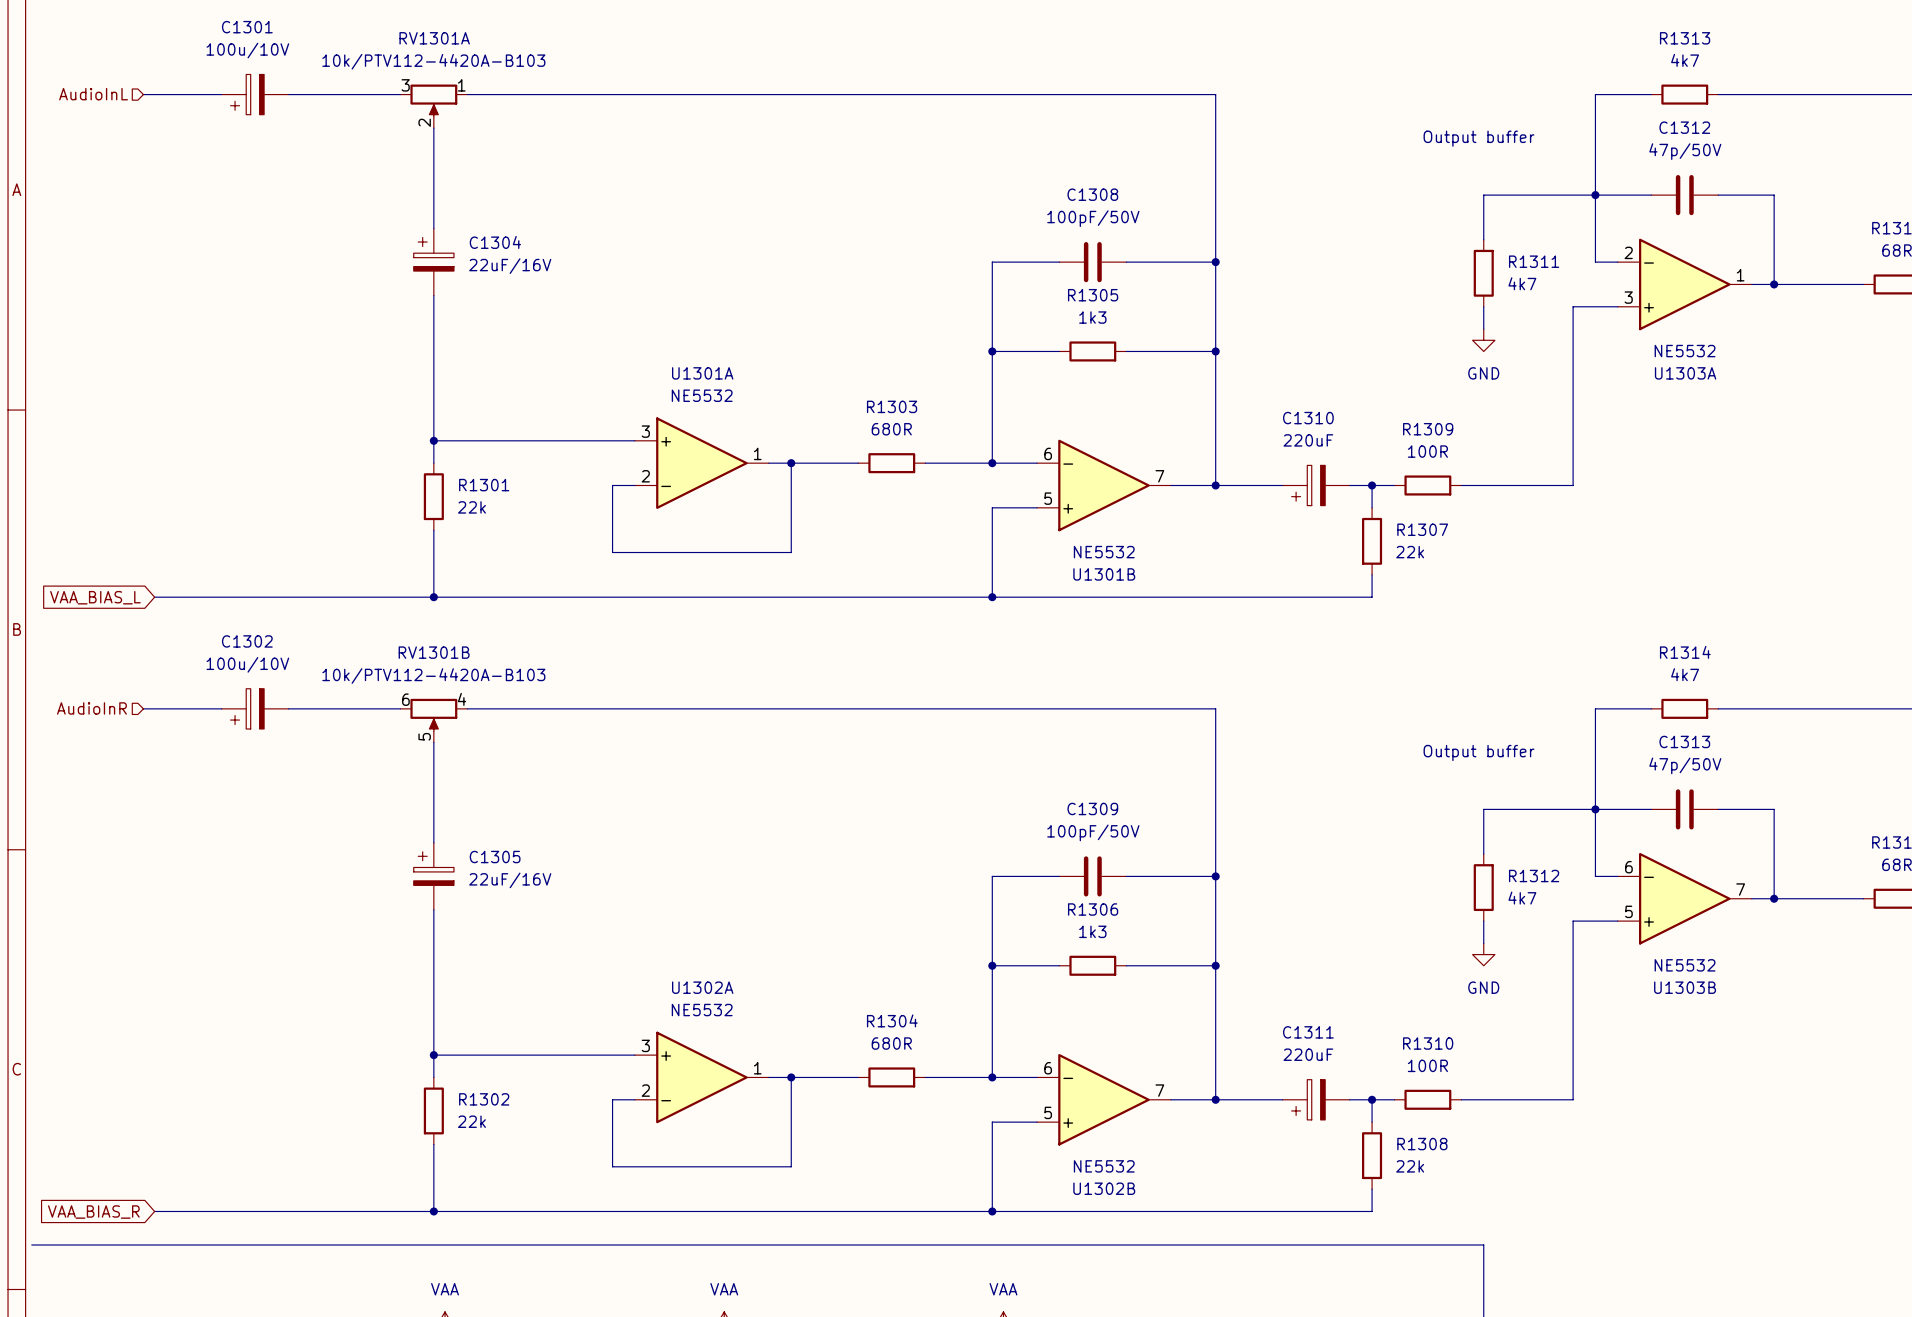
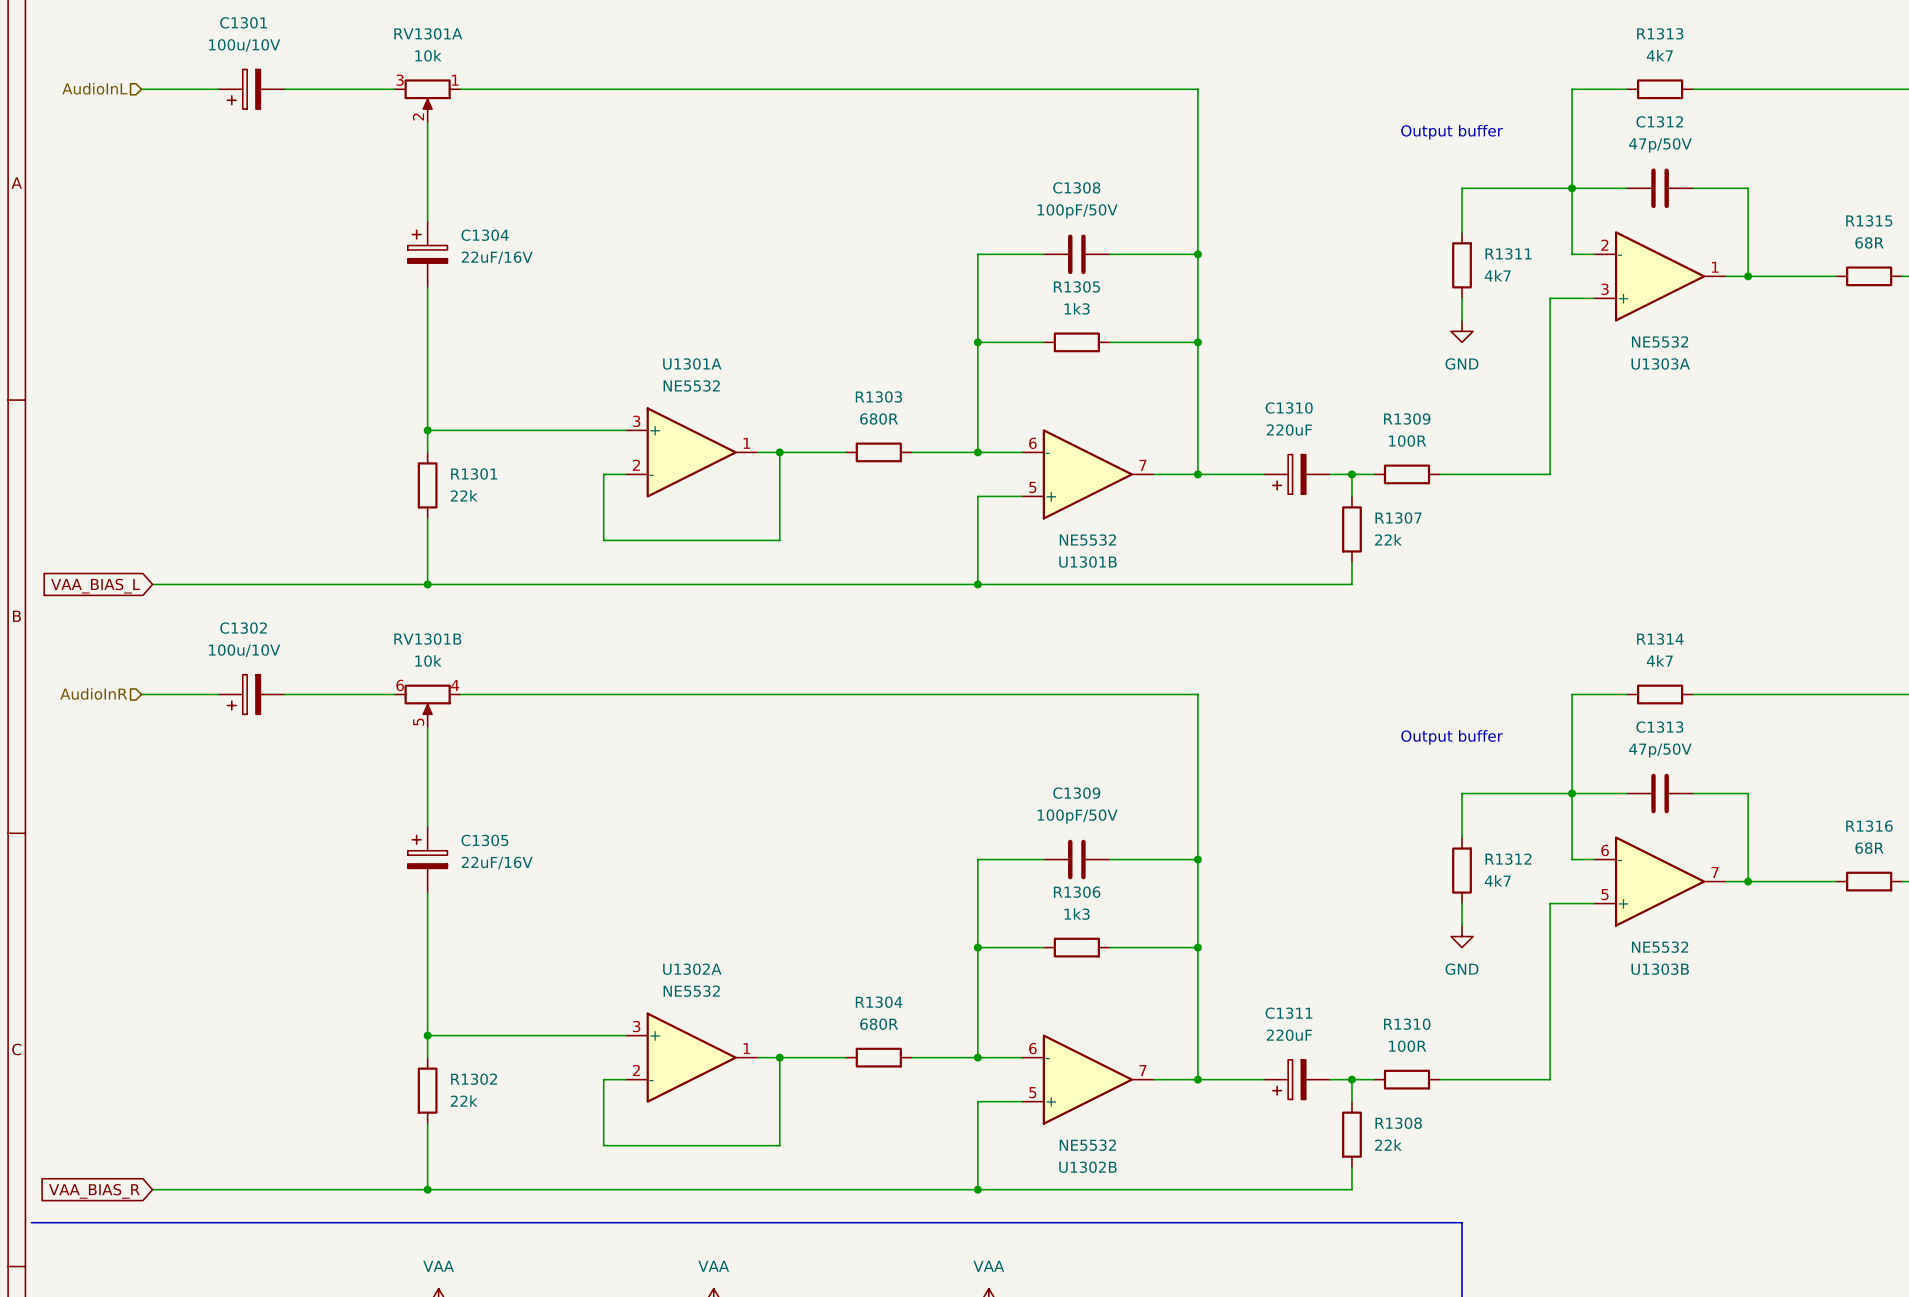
RV1301A value: 10k/PTV112-4420A-B103 (433, 61) -> 10k (428, 55)
RV1301B value: 10k/PTV112-4420A-B103 (433, 676) -> 10k (428, 660)

